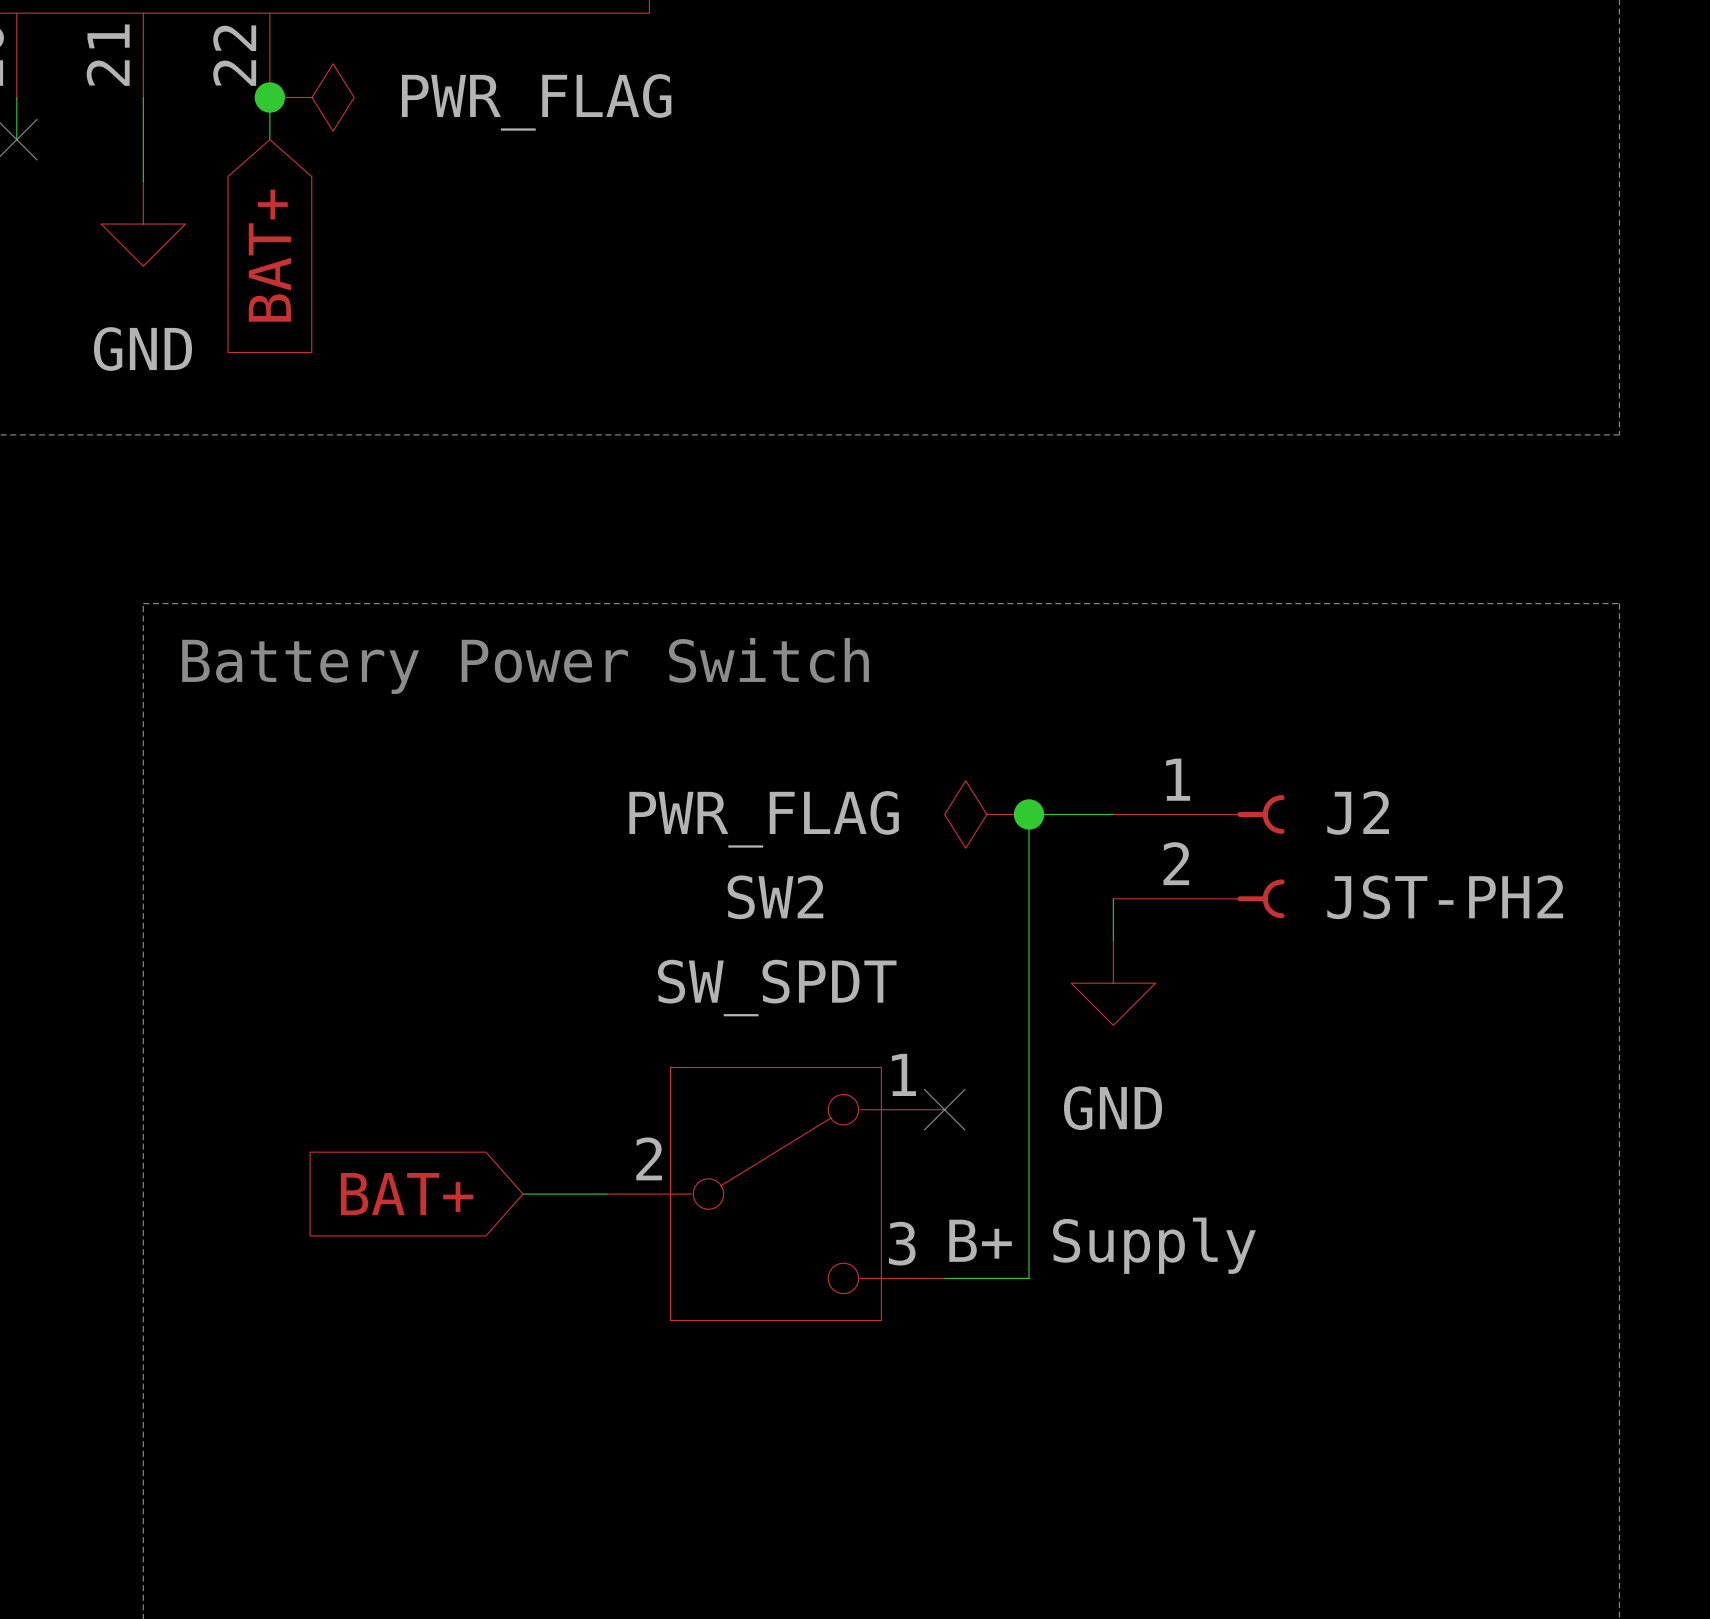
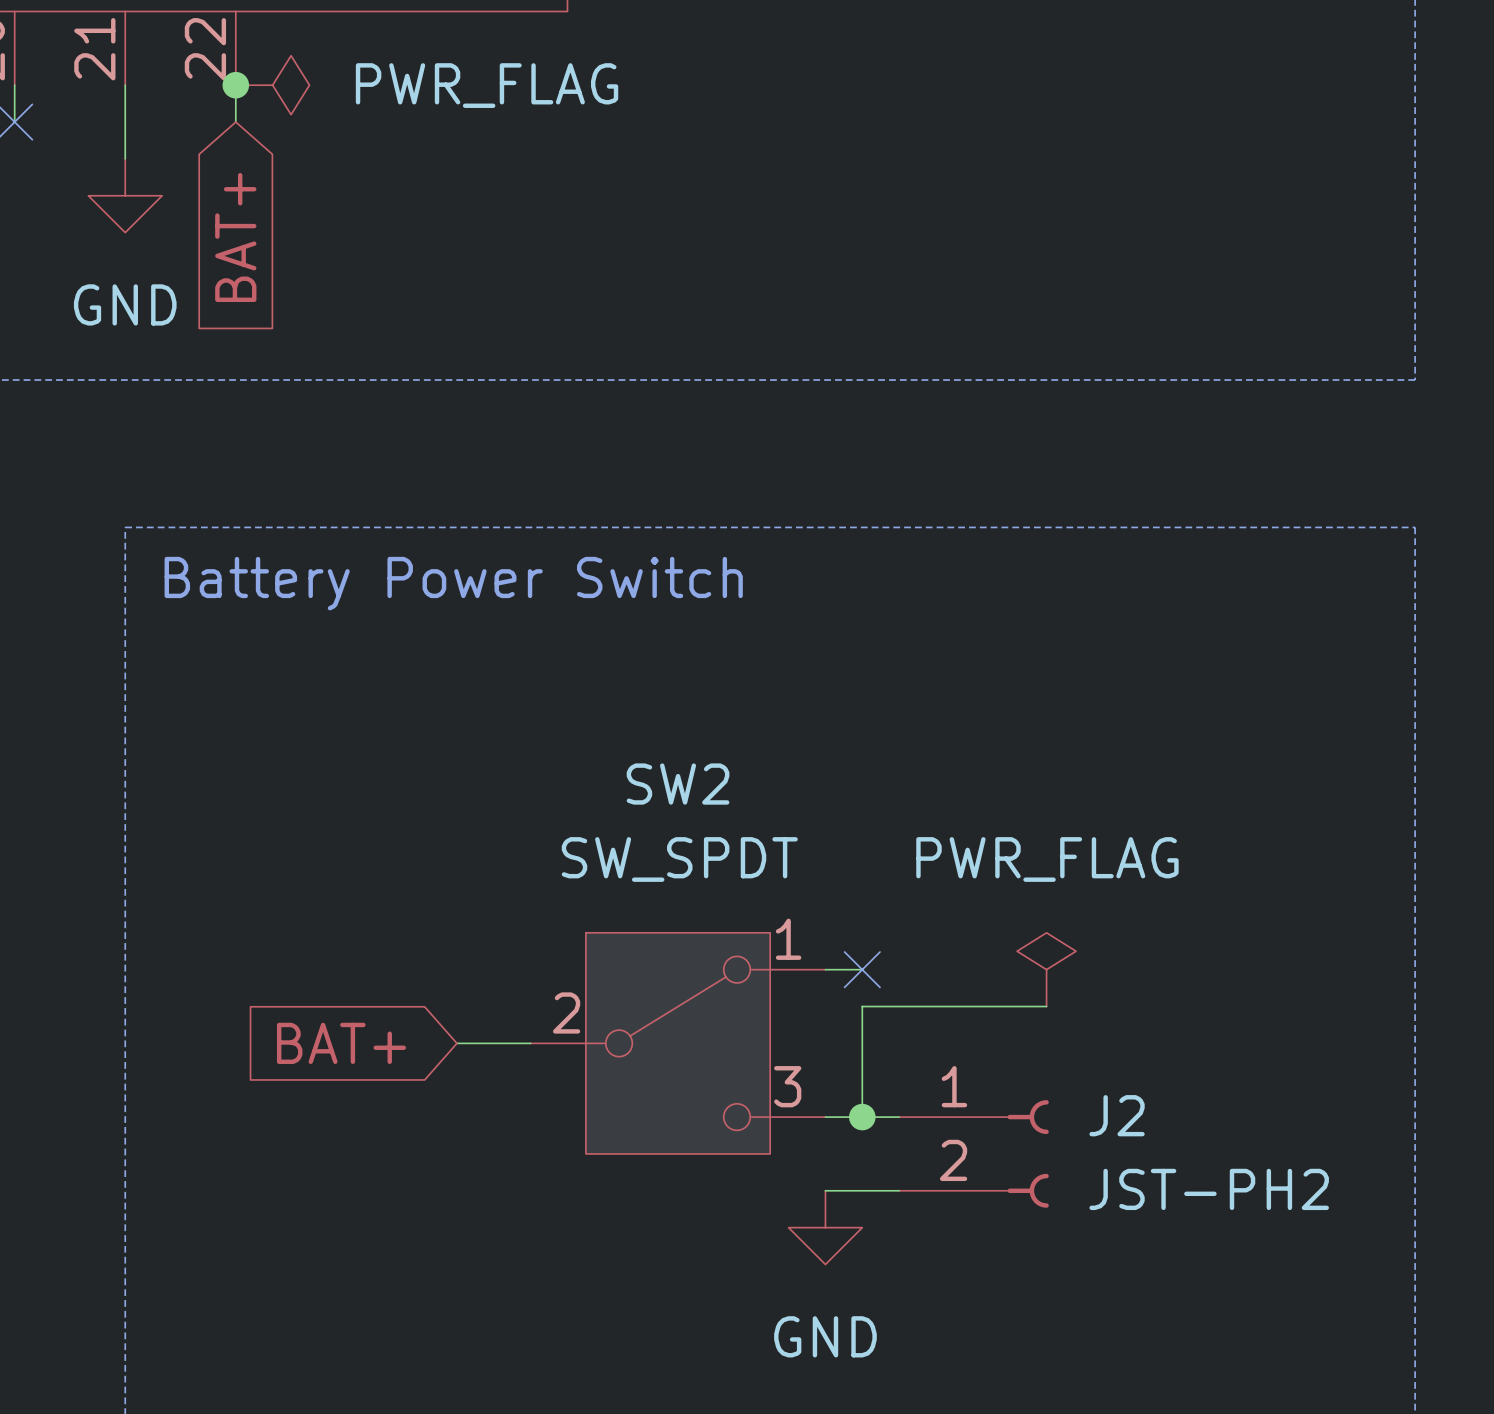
power symbol rotation: 0° (986, 814) -> 90° clockwise (1046, 969)
power symbol position: PWR_FLAG (986, 814) -> PWR_FLAG (1046, 969)
junction: (1029, 814) -> none
wire: (1113, 814) (1029, 814) (1029, 1278) -> none
power symbol text position: PWR_FLAG (764, 819) -> PWR_FLAG (1047, 859)
J2 position: (1198, 856) -> (973, 1153)
wire: (1113, 898) (1113, 941) -> none
power symbol position: GND (1113, 983) -> GND (825, 1227)
wire: none -> (825, 969) (862, 969)
no-connect mark position: (944, 1109) -> (862, 969)
wire: none -> (1046, 1006) (862, 1006) (862, 1117)
label: B+ Supply (1102, 1245) -> none
junction: none -> (862, 1117)
wire: none -> (825, 1190) (899, 1190)

